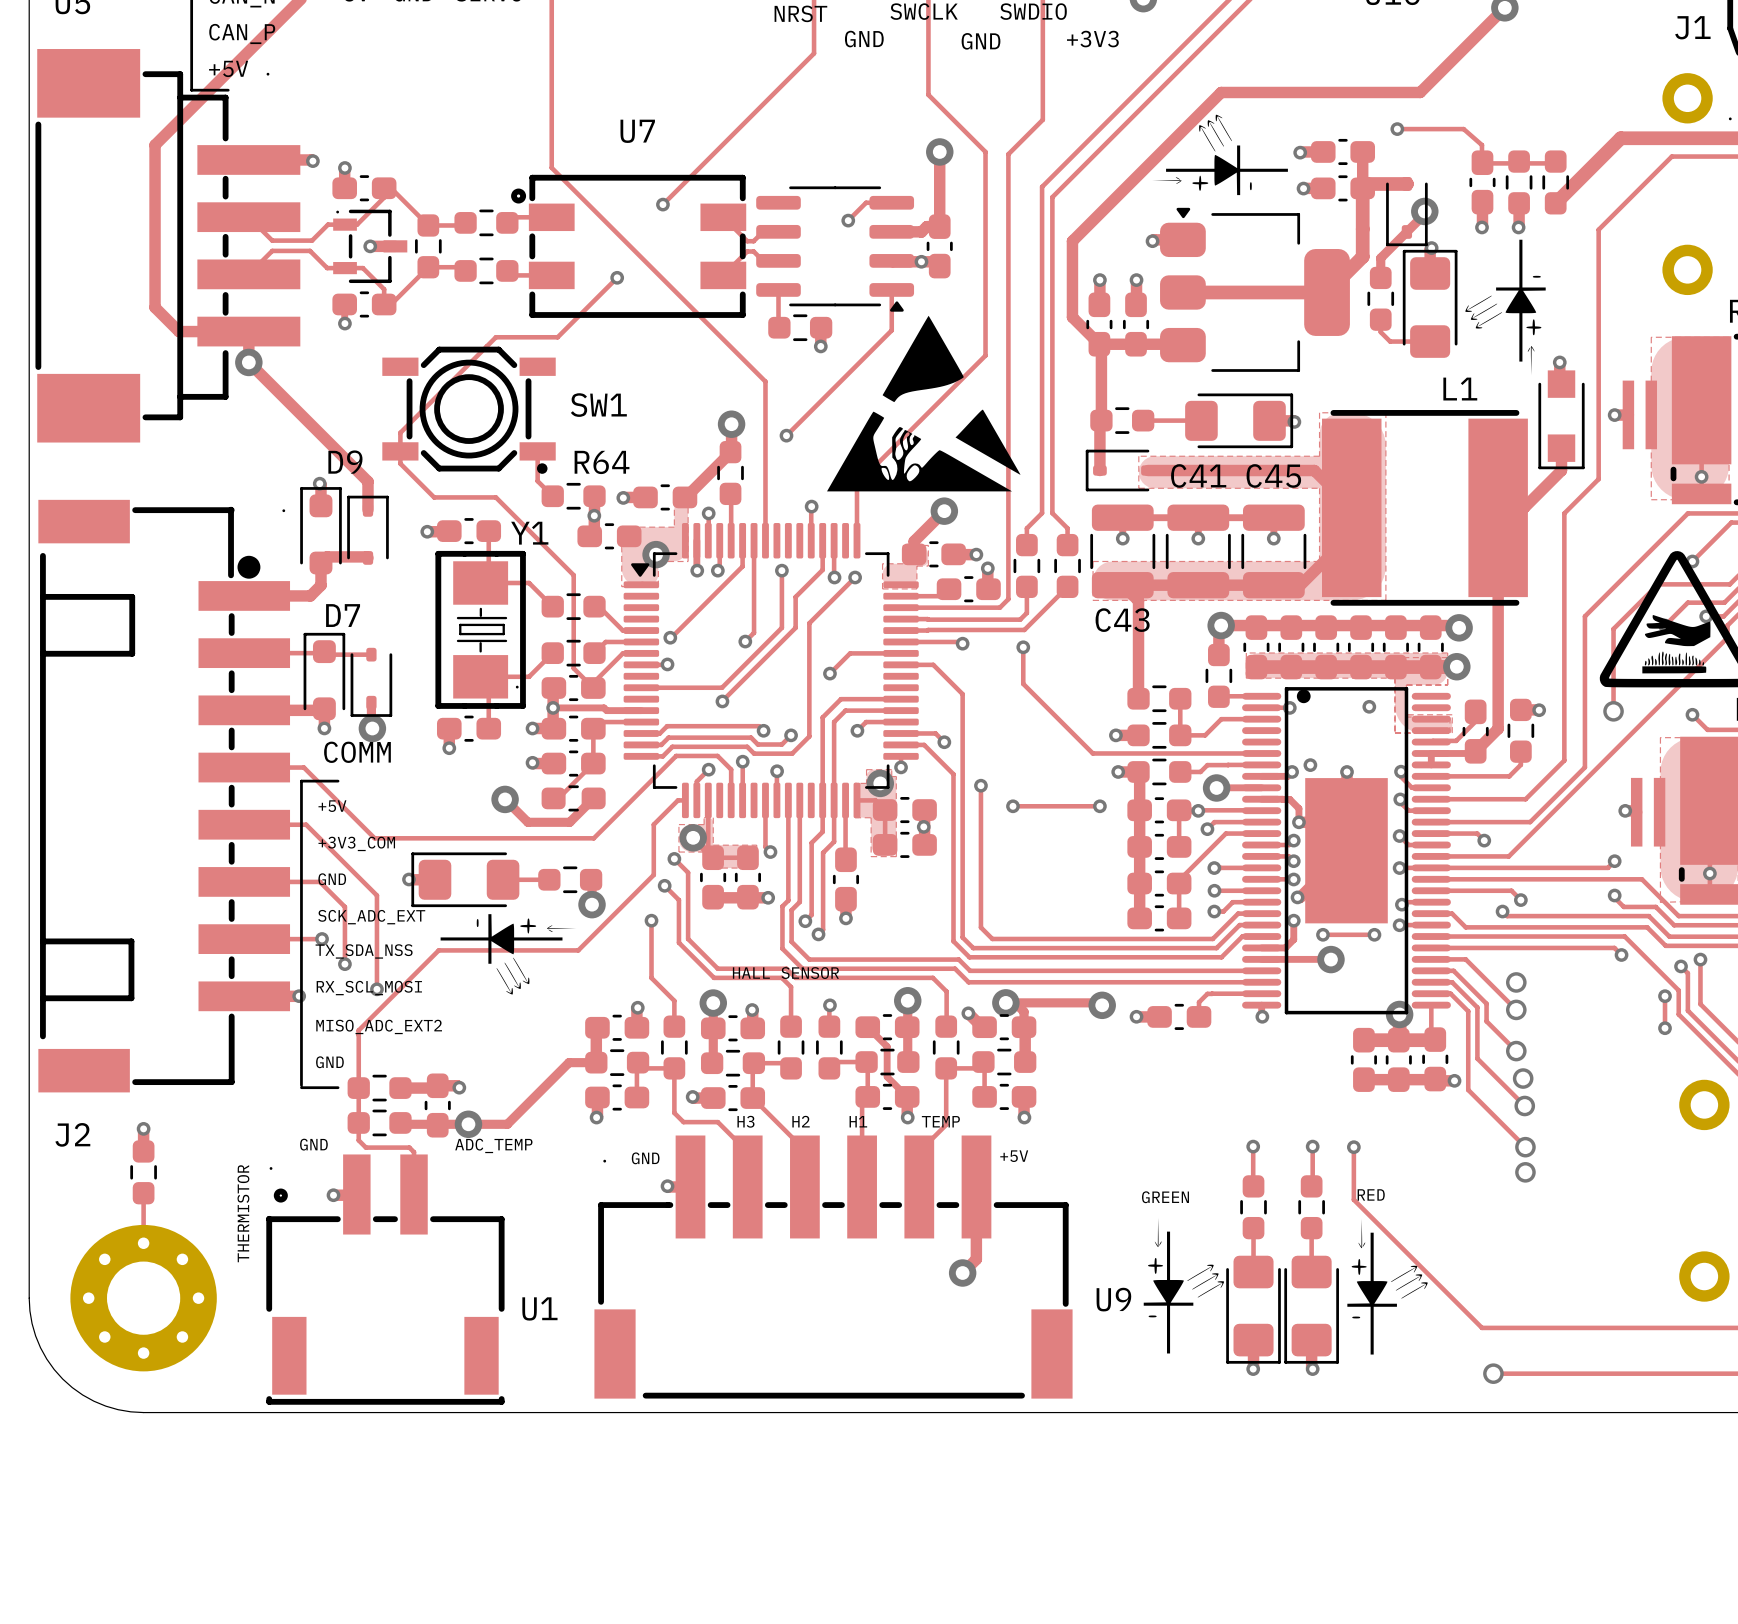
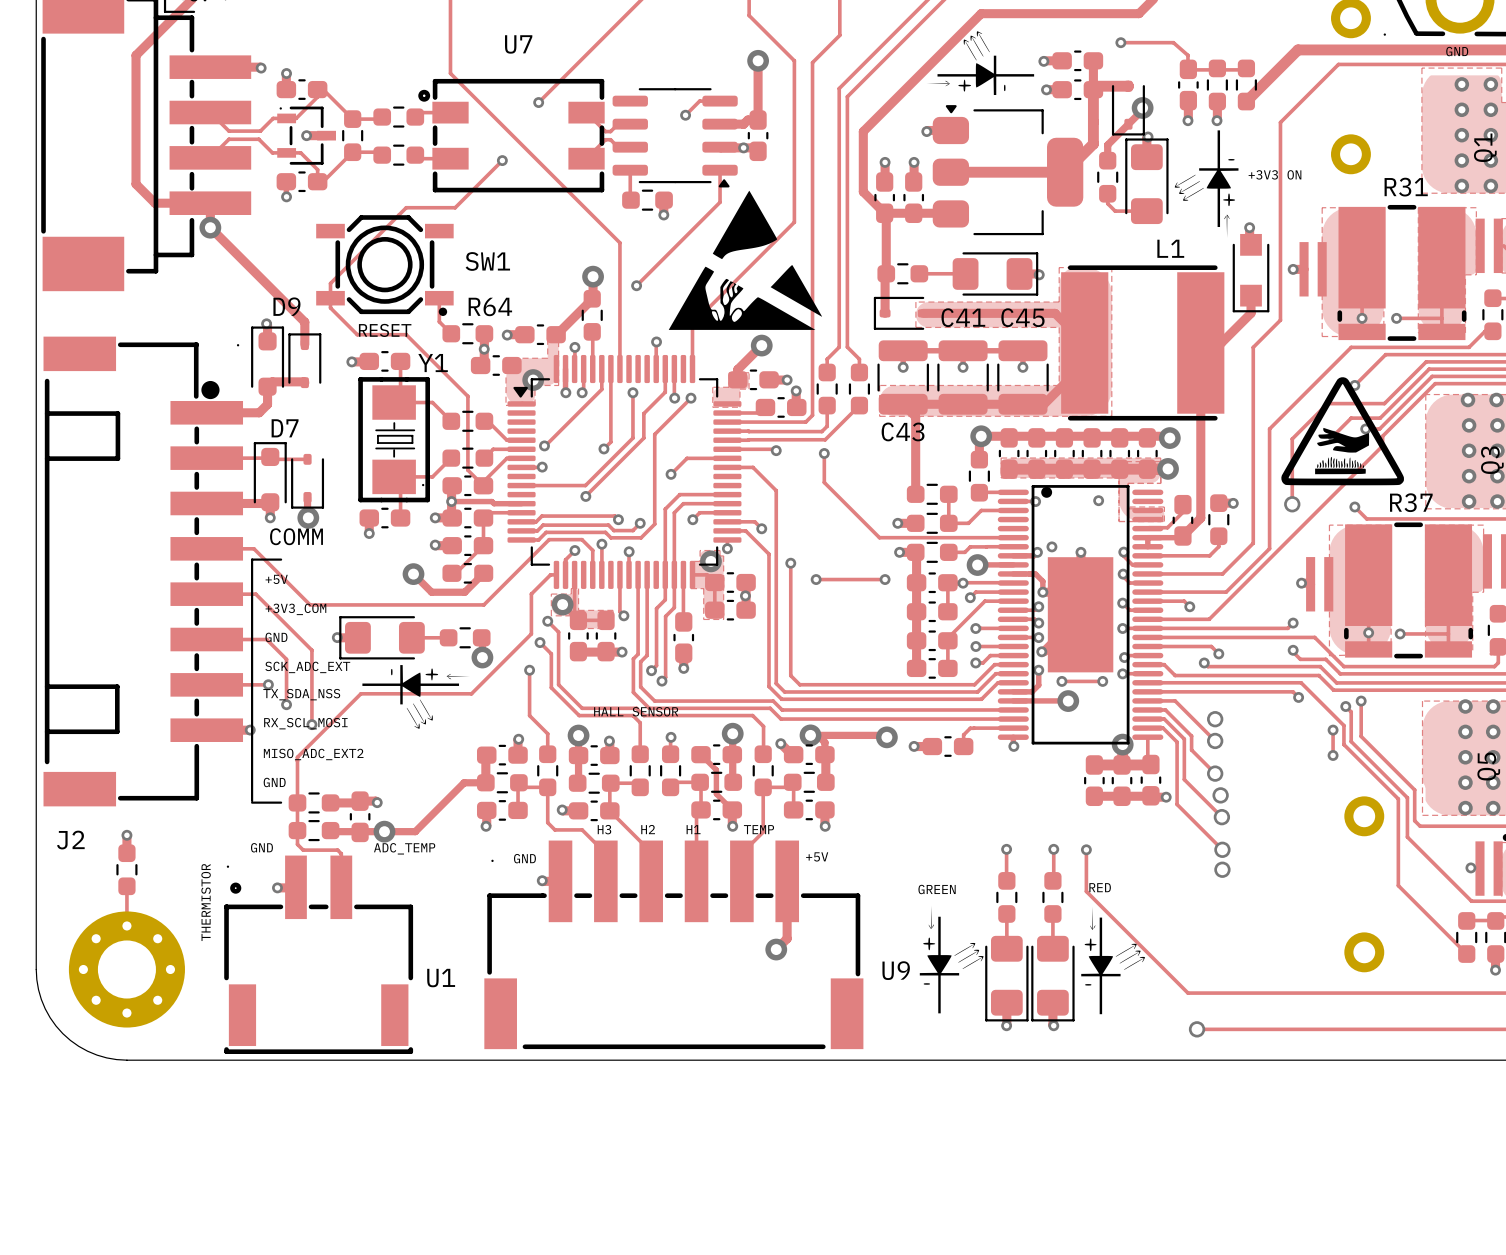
text: none -> +3V3 ON (1274, 174)
text: none -> RESET (385, 330)

